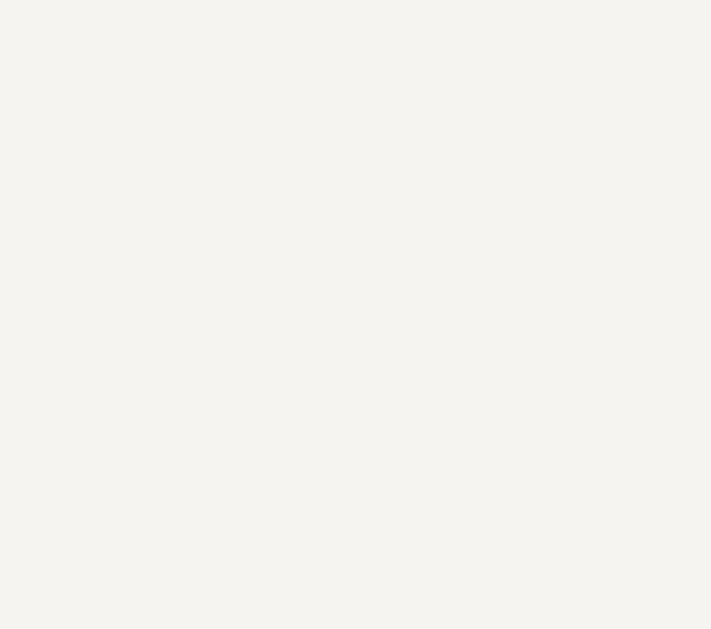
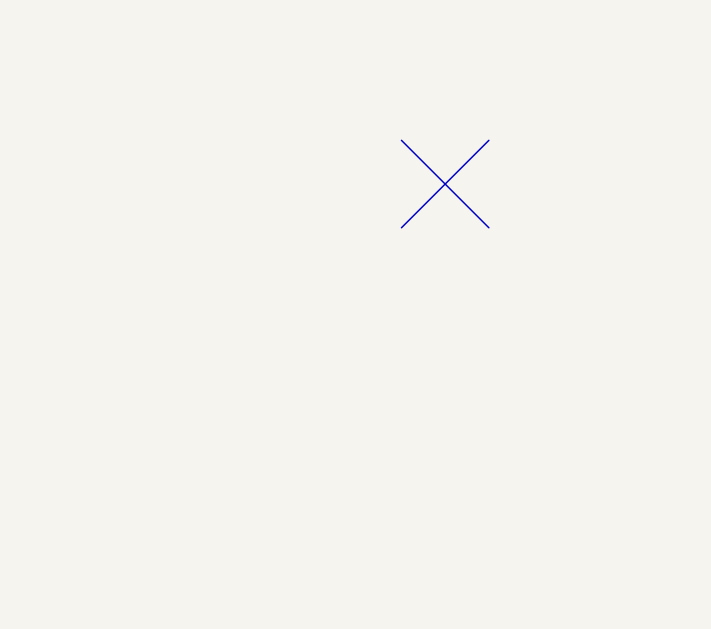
no-connect mark: none -> (445, 184)

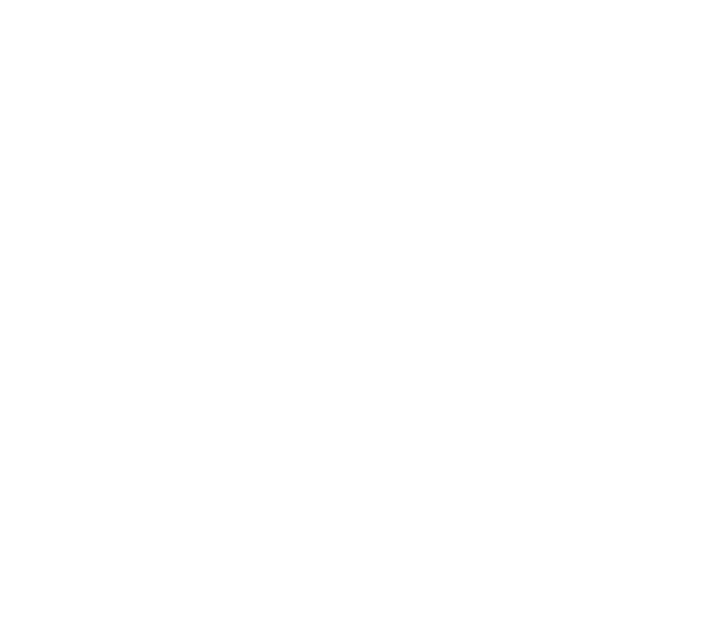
no-connect mark: (445, 184) -> none

